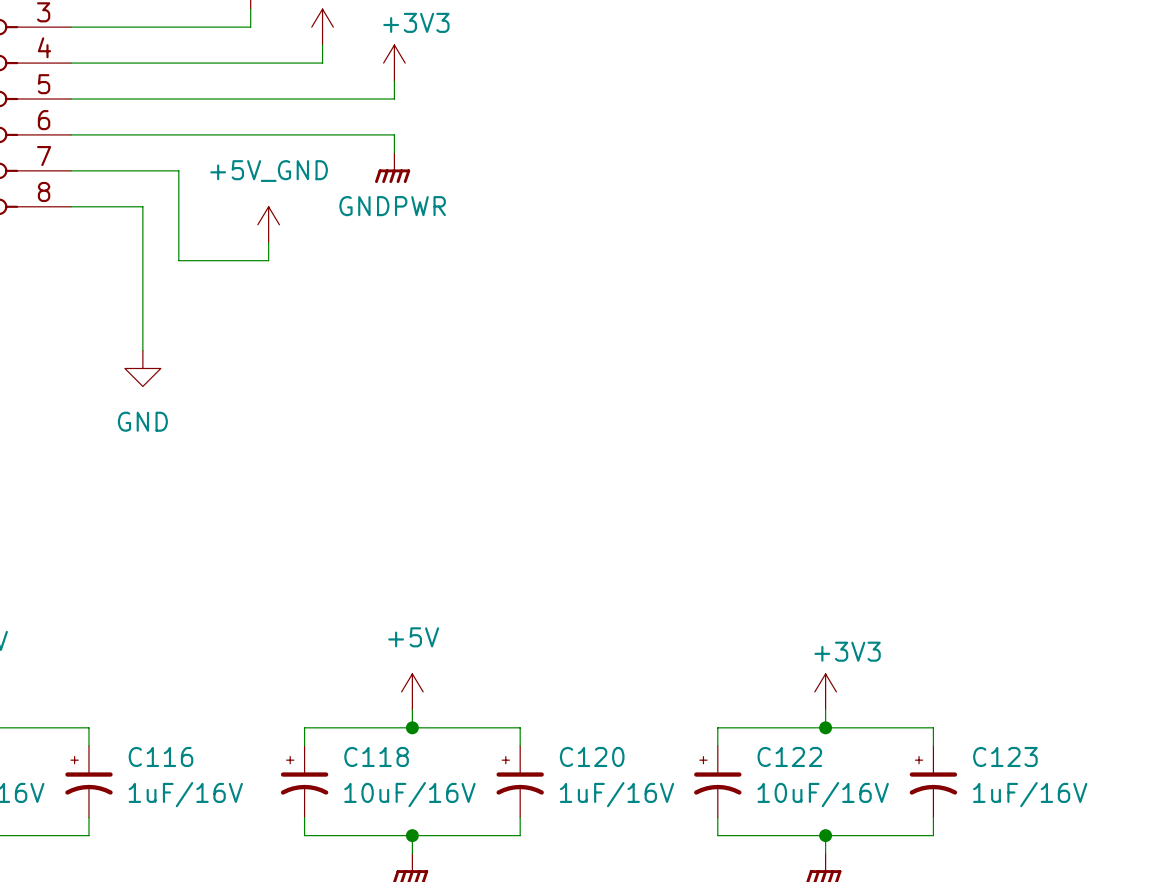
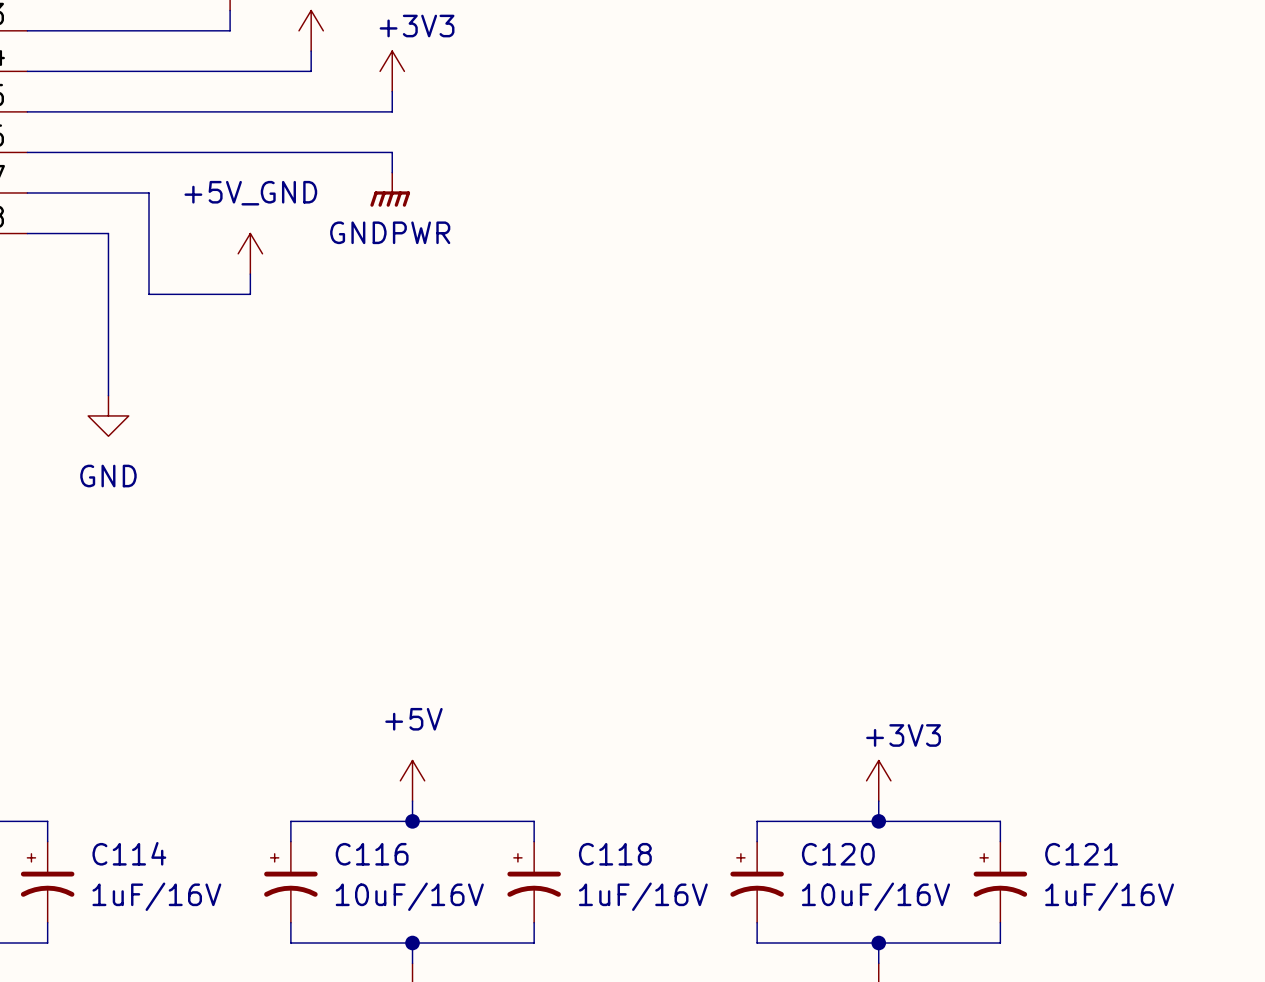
C116 name: C116 (160, 756) -> C114 (129, 853)
C118 name: C118 (376, 756) -> C116 (372, 854)
C120 name: C120 (592, 756) -> C118 (615, 854)
C122 name: C122 (789, 756) -> C120 (838, 854)
C123 name: C123 (1005, 756) -> C121 (1081, 854)

